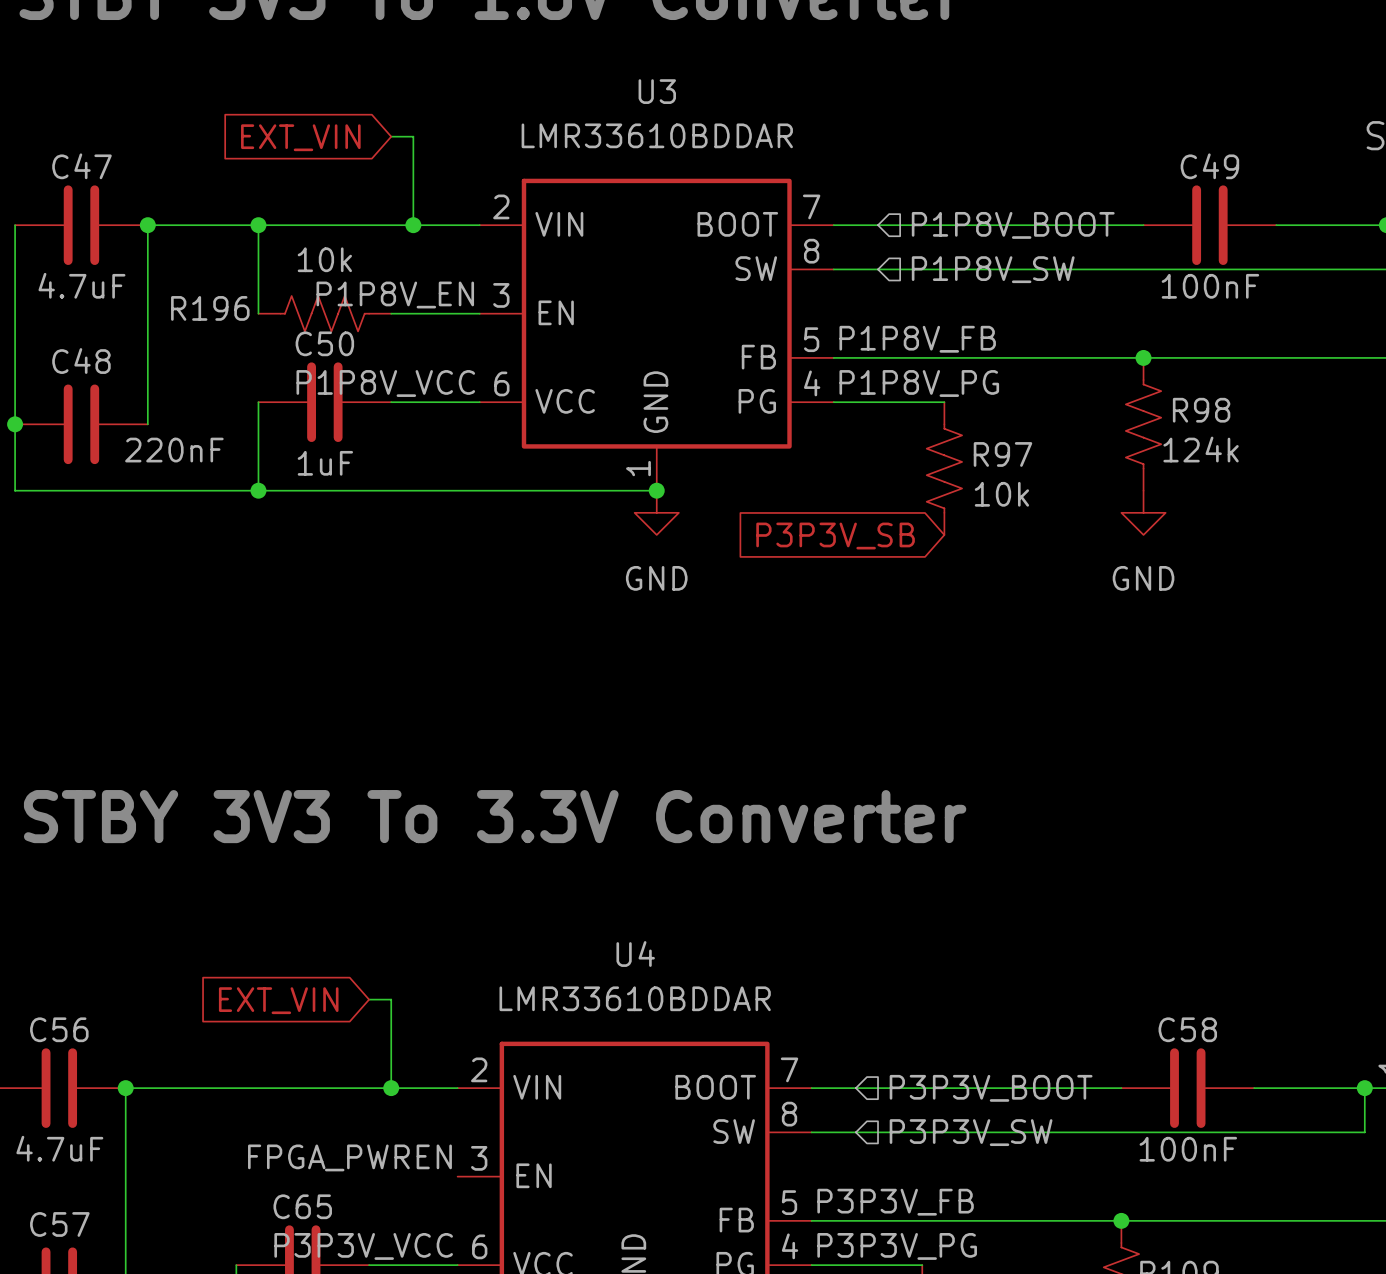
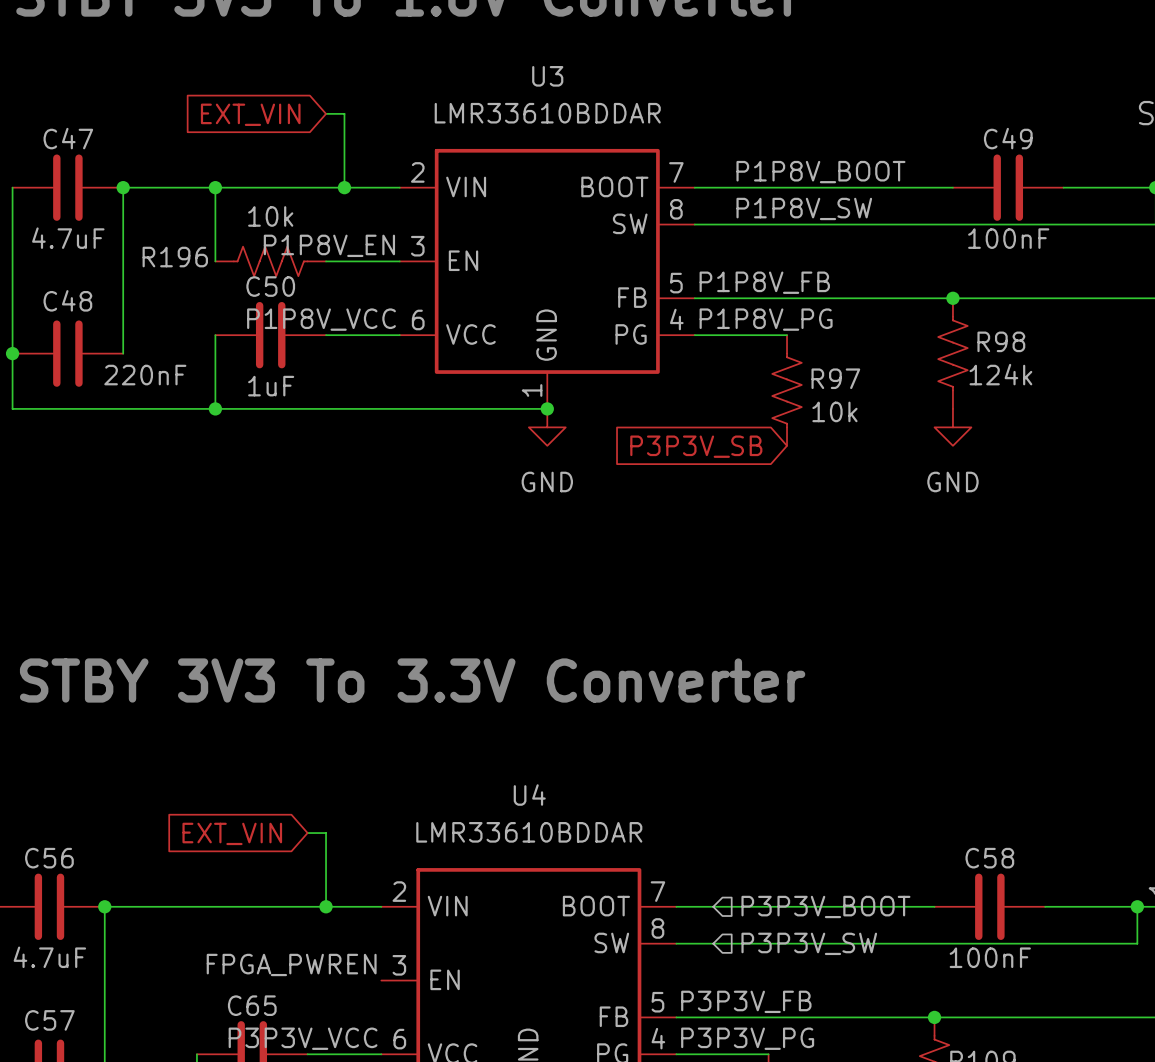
label: none -> P1P8V_BOOT (820, 172)
hierarchical label: P1P8V_BOOT (1013, 225) -> none
label: none -> P1P8V_SW (804, 208)
hierarchical label: P1P8V_SW (993, 269) -> none

